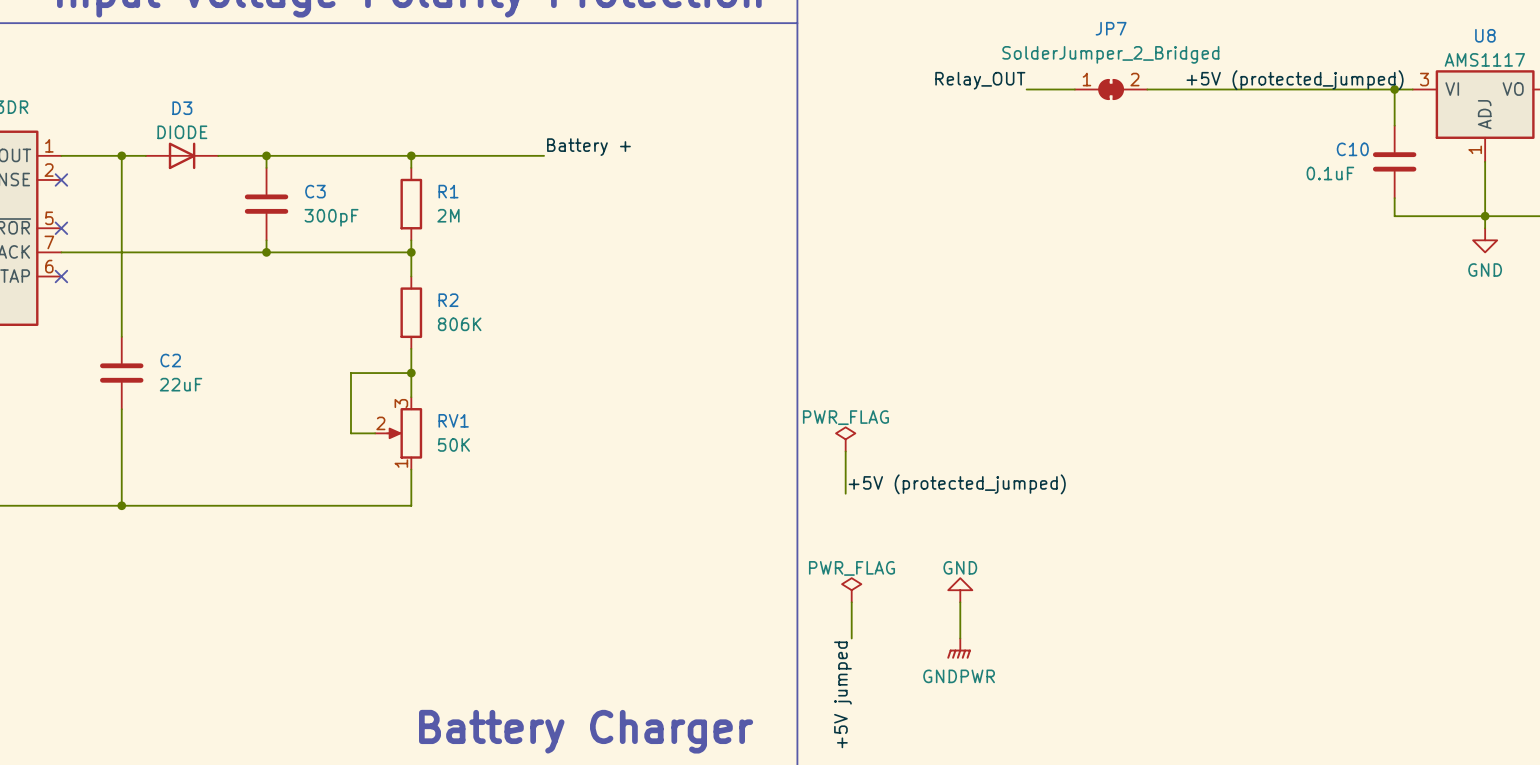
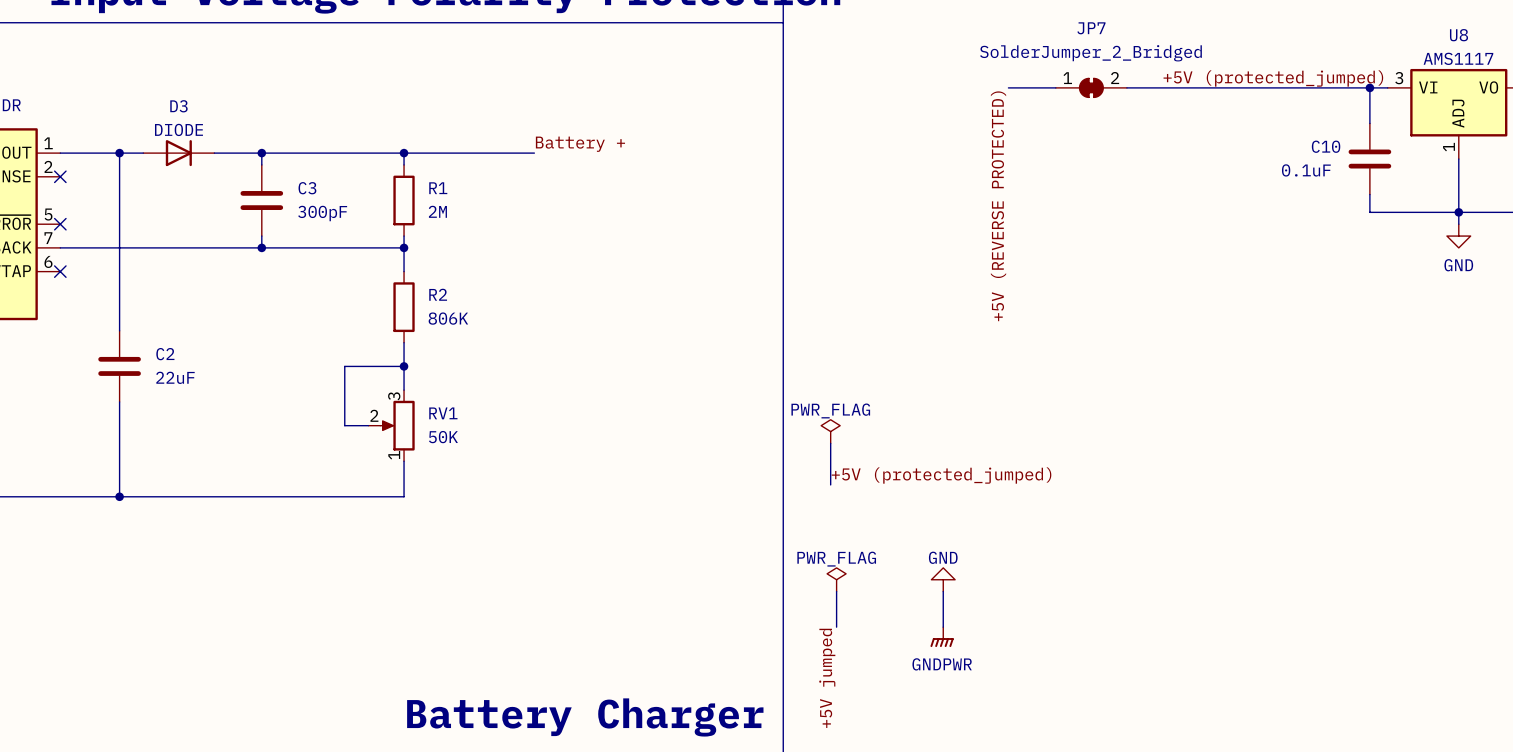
label: Relay_OUT (980, 80) -> +5V (REVERSE PROTECTED) (998, 206)

